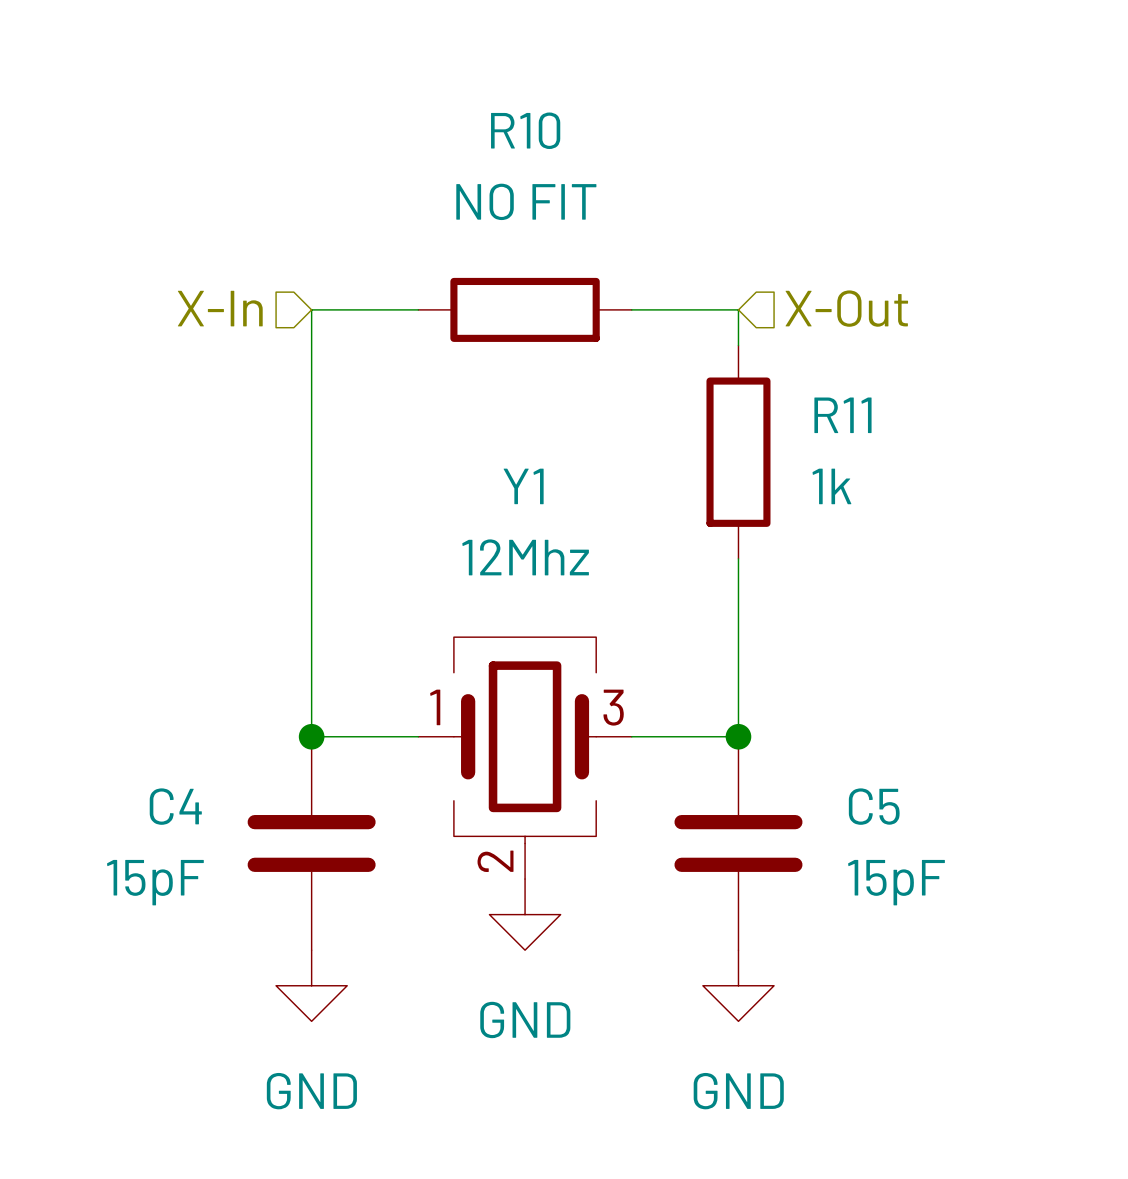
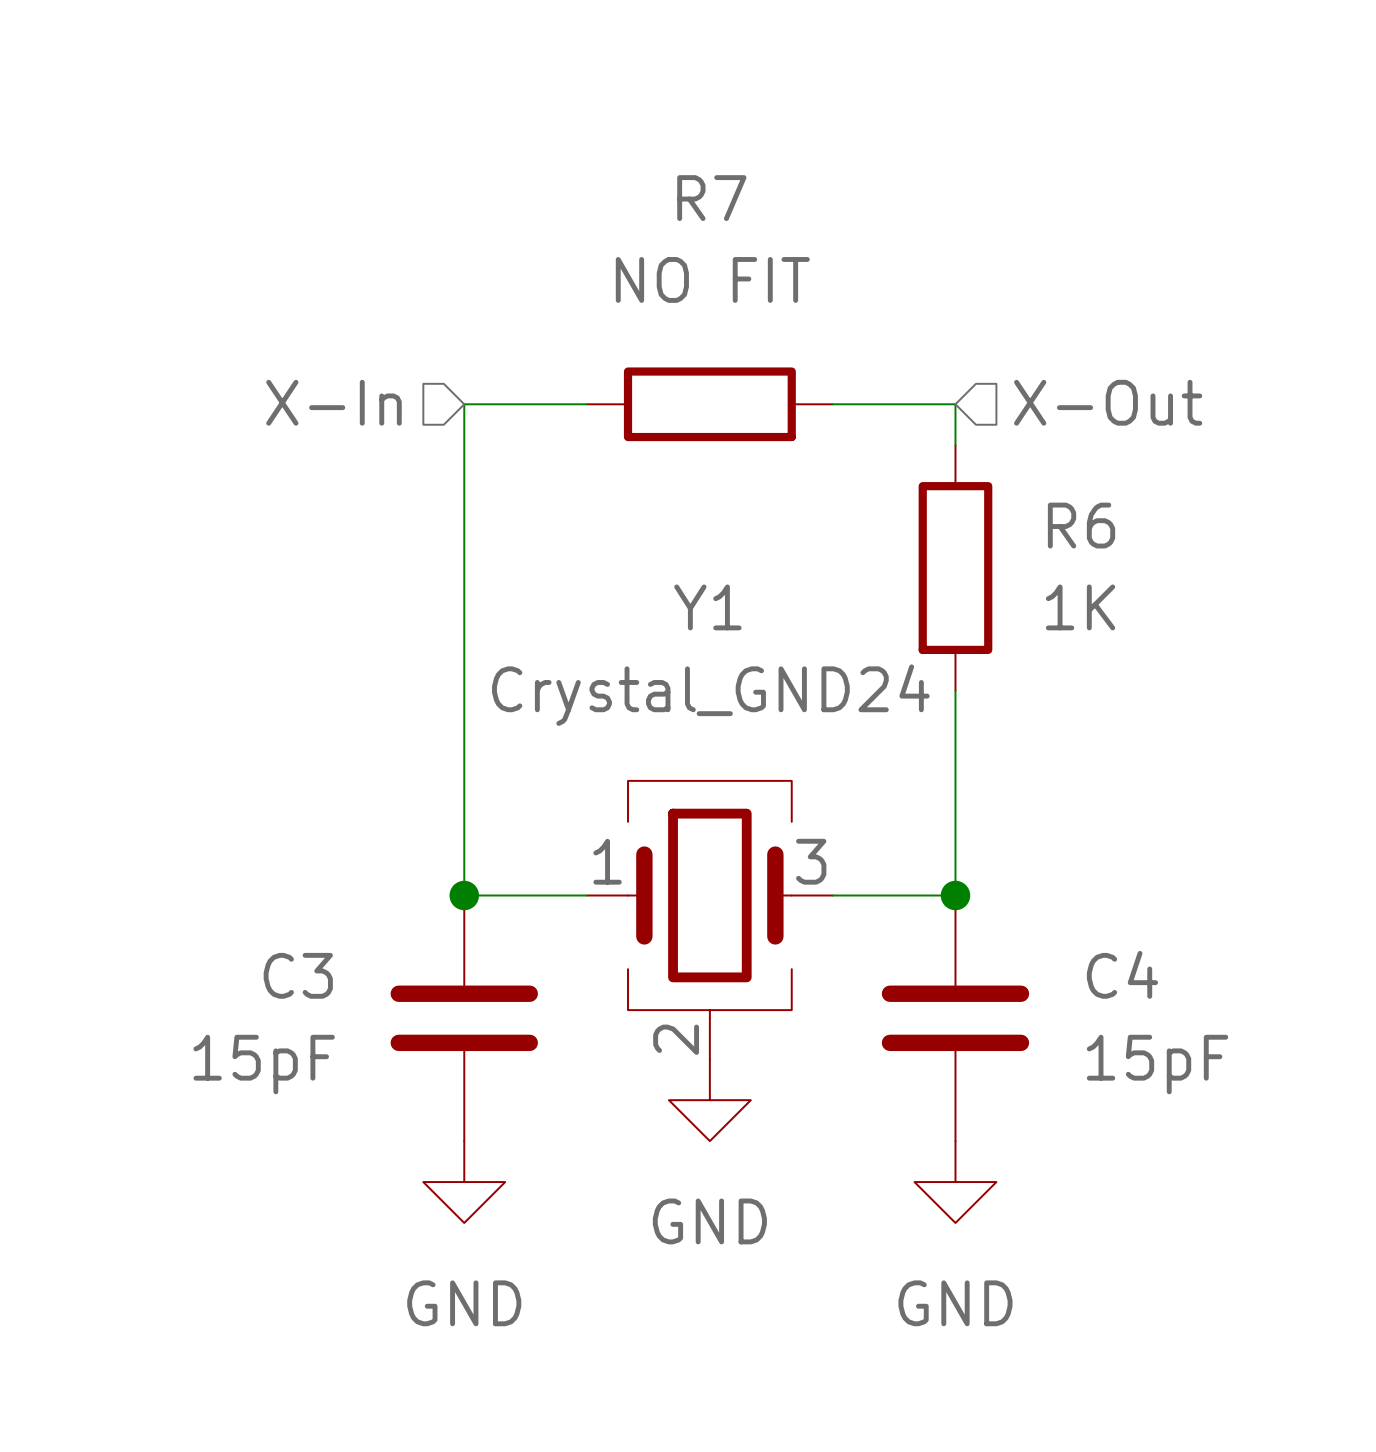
R10 name: R10 (525, 130) -> R7 (711, 198)
R11 name: R11 (842, 415) -> R6 (1081, 525)
R11 value: 1k (831, 486) -> 1K (1080, 607)
Y1 value: 12Mhz (525, 557) -> Crystal_GND24 (710, 695)
C4 name: C4 (175, 806) -> C3 (298, 975)
C5 name: C5 (874, 806) -> C4 (1122, 974)

